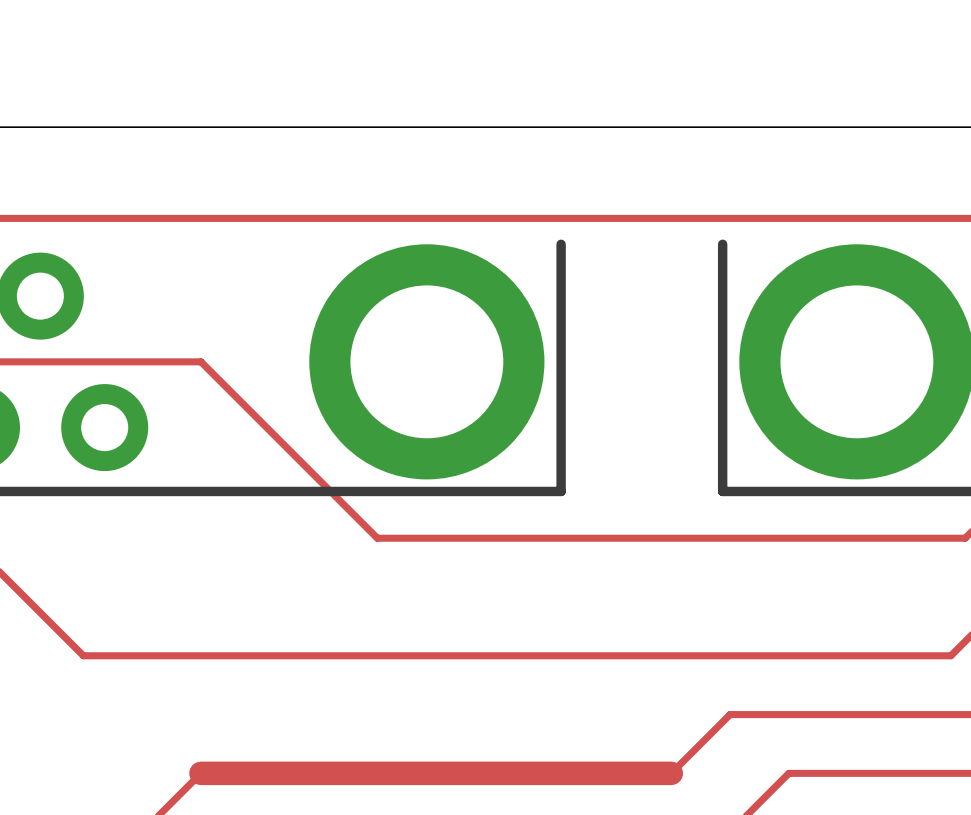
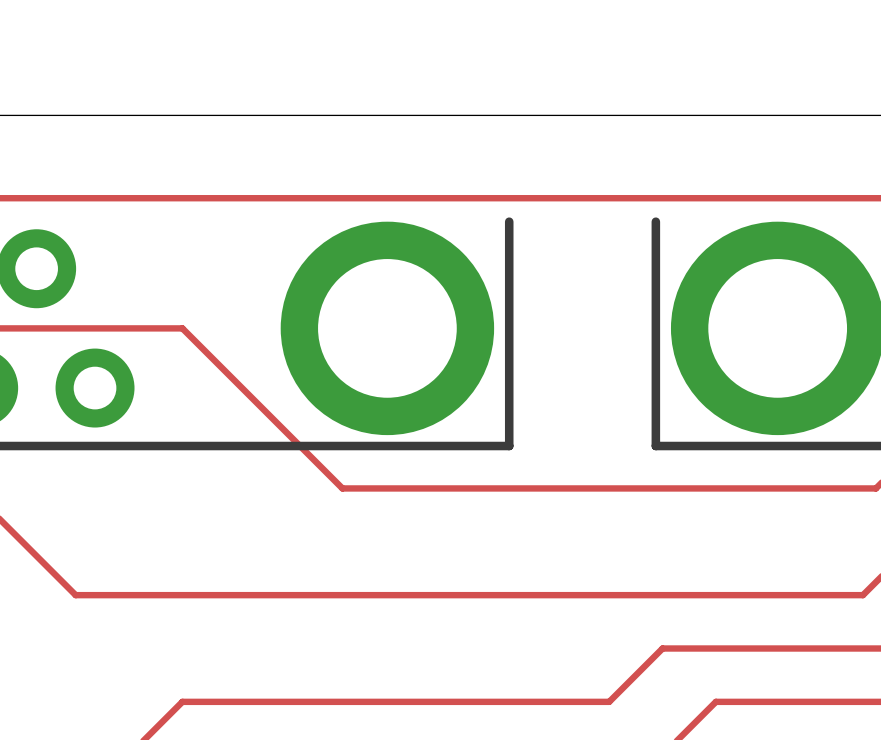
track width: thick (200, 773) (671, 773) -> thin (182, 701) (609, 701)

